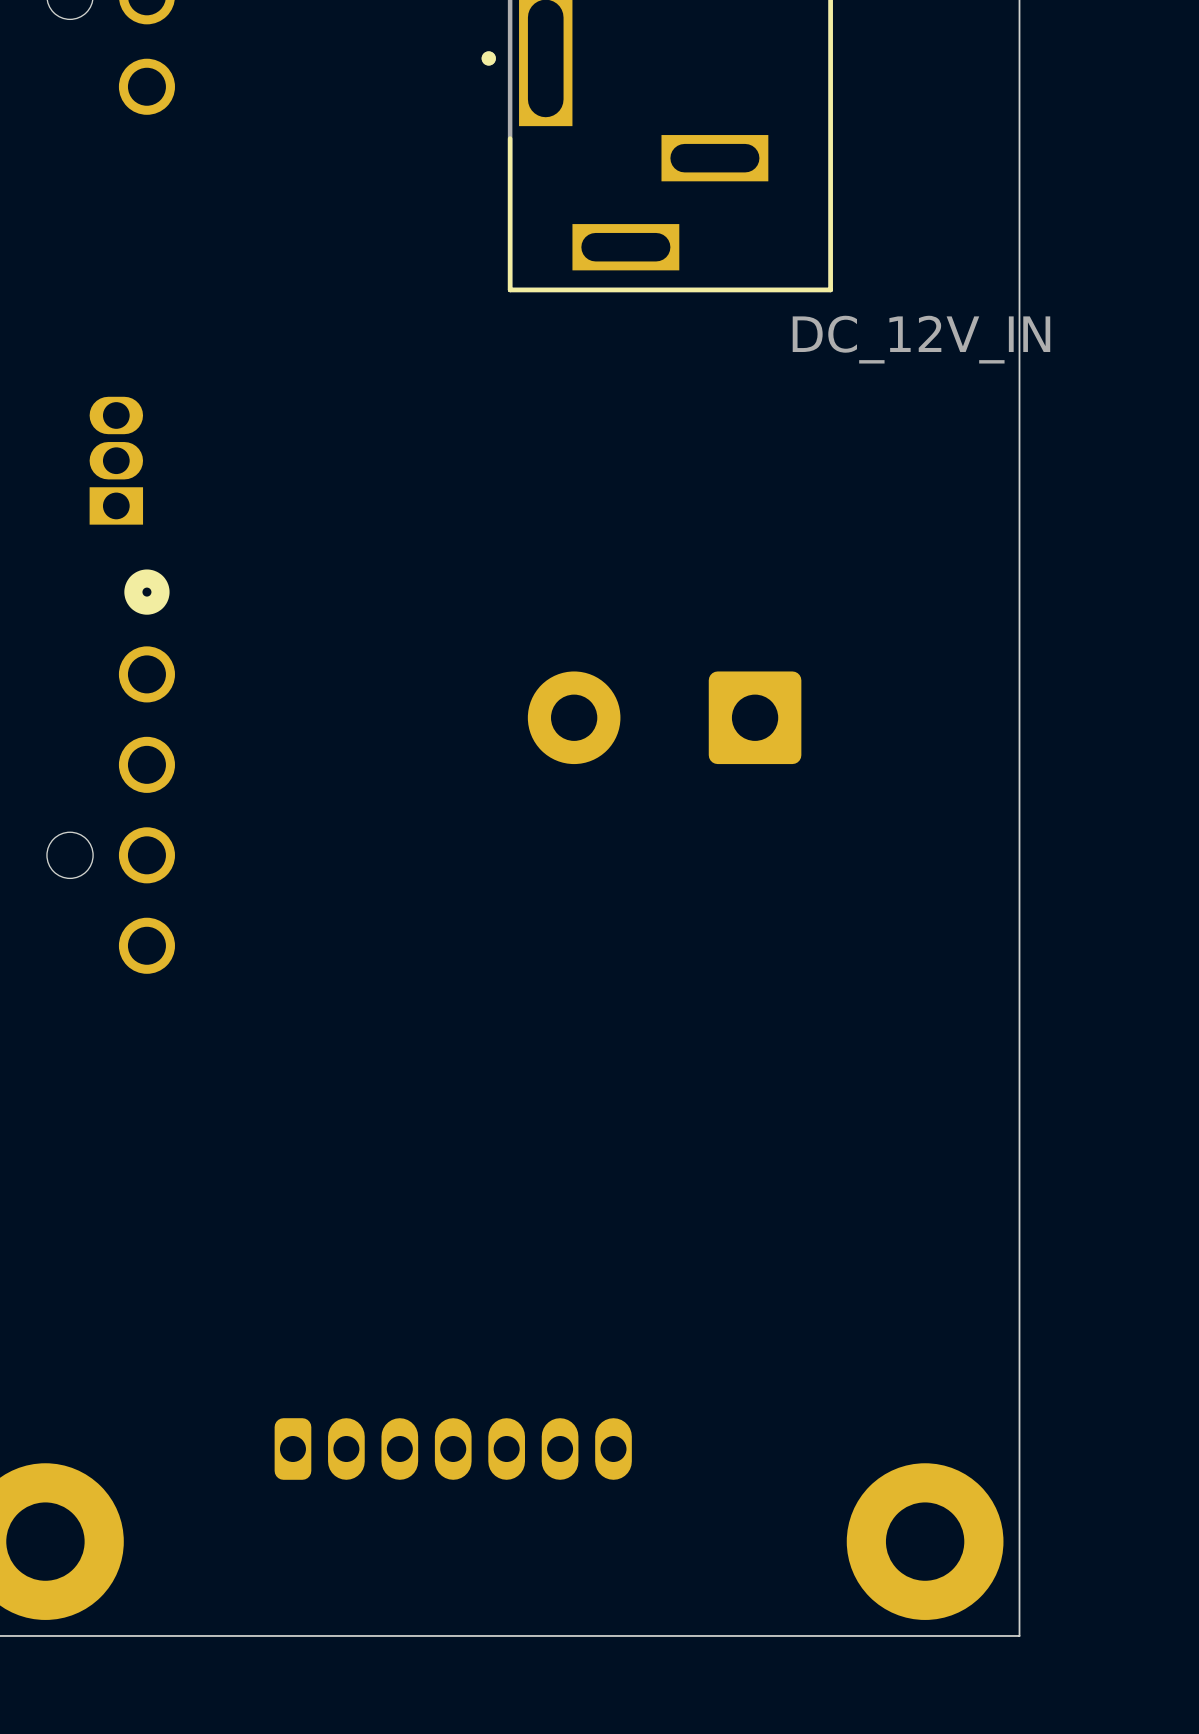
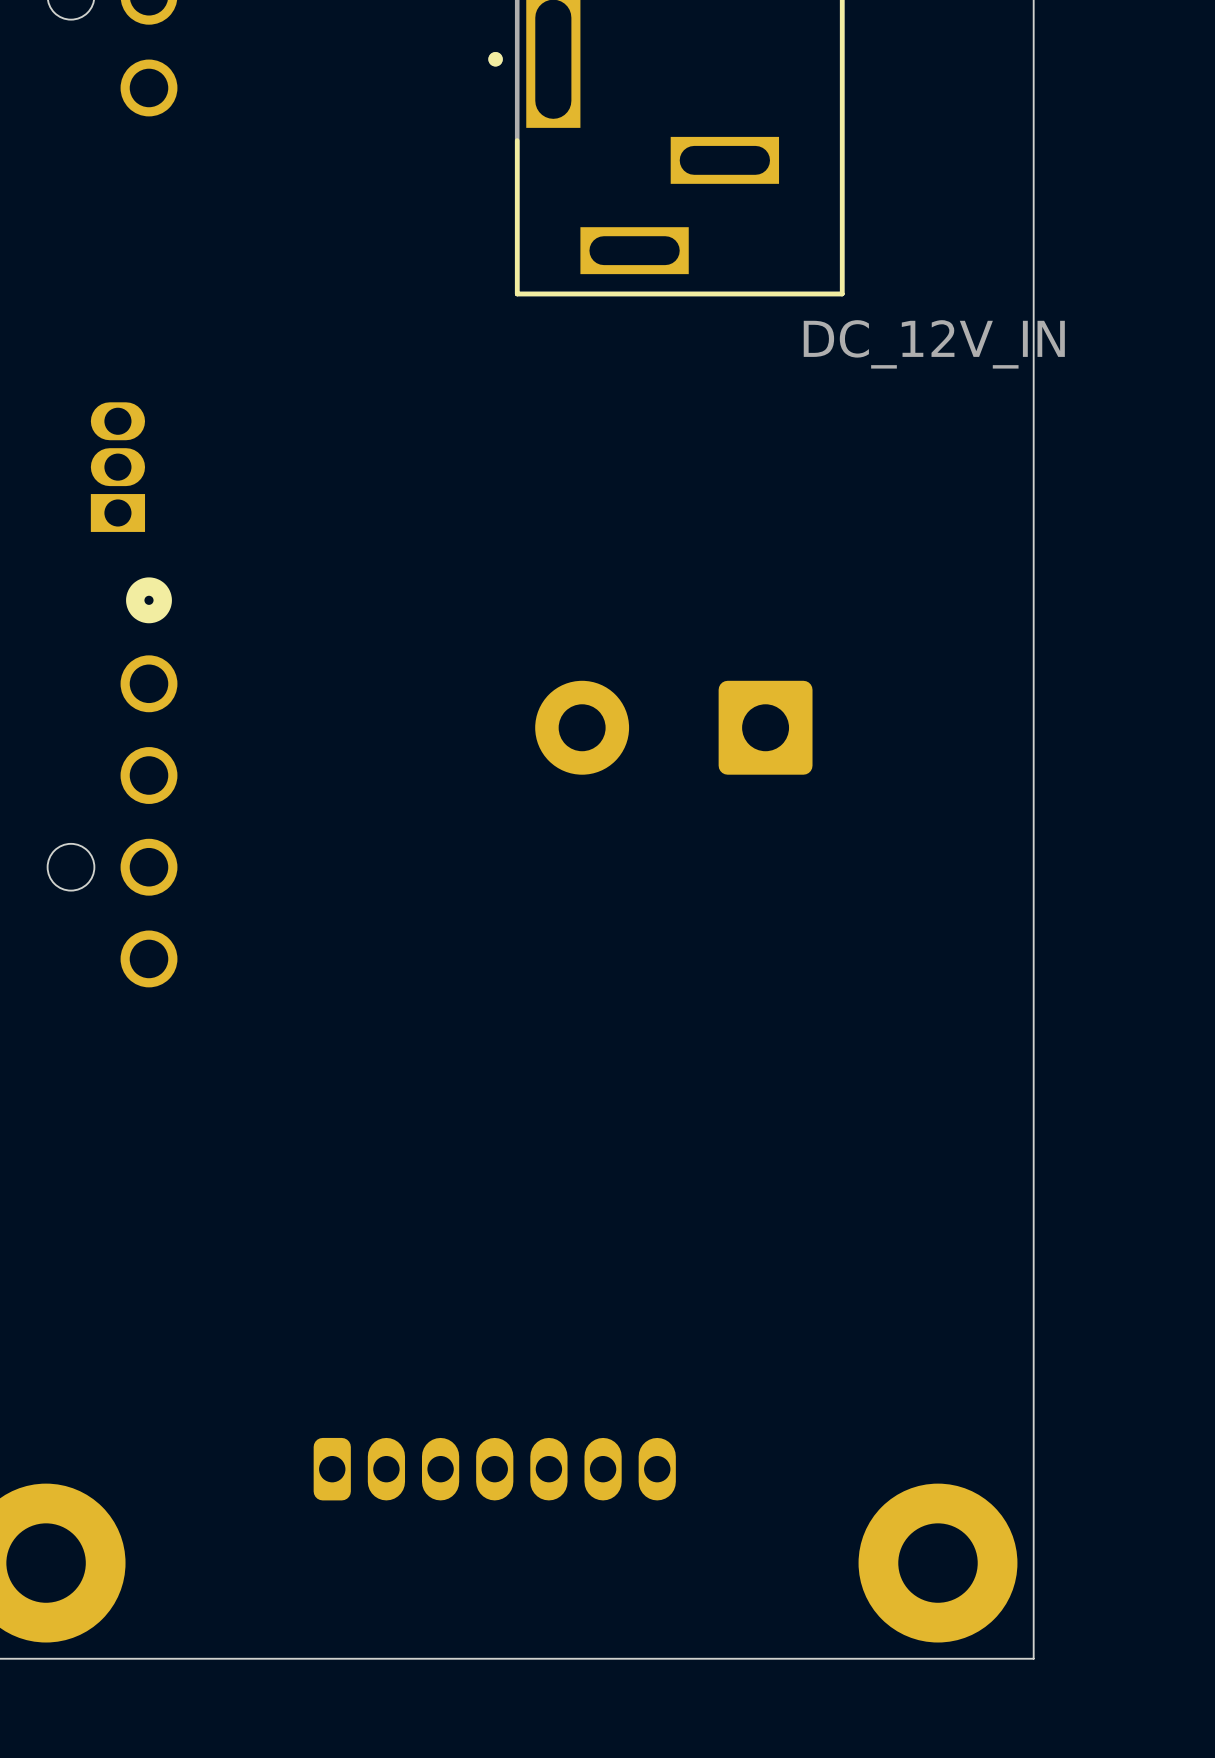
part position: (453, 1449) -> (494, 1469)

